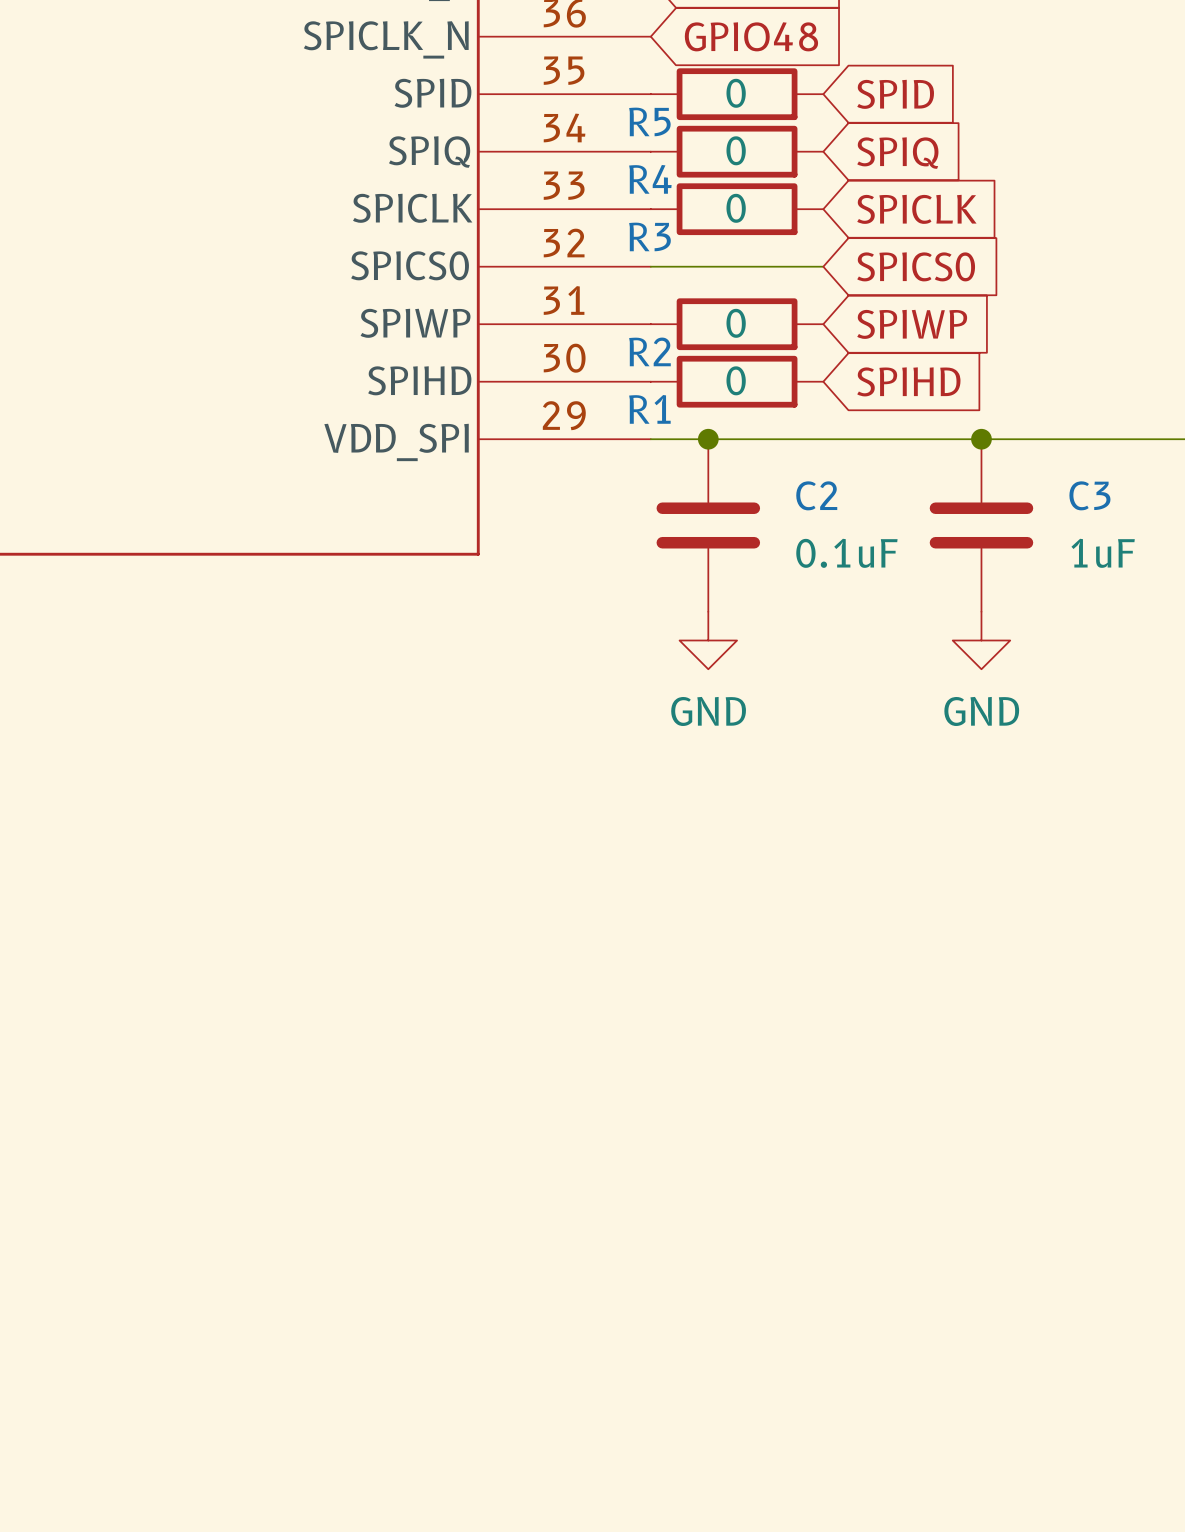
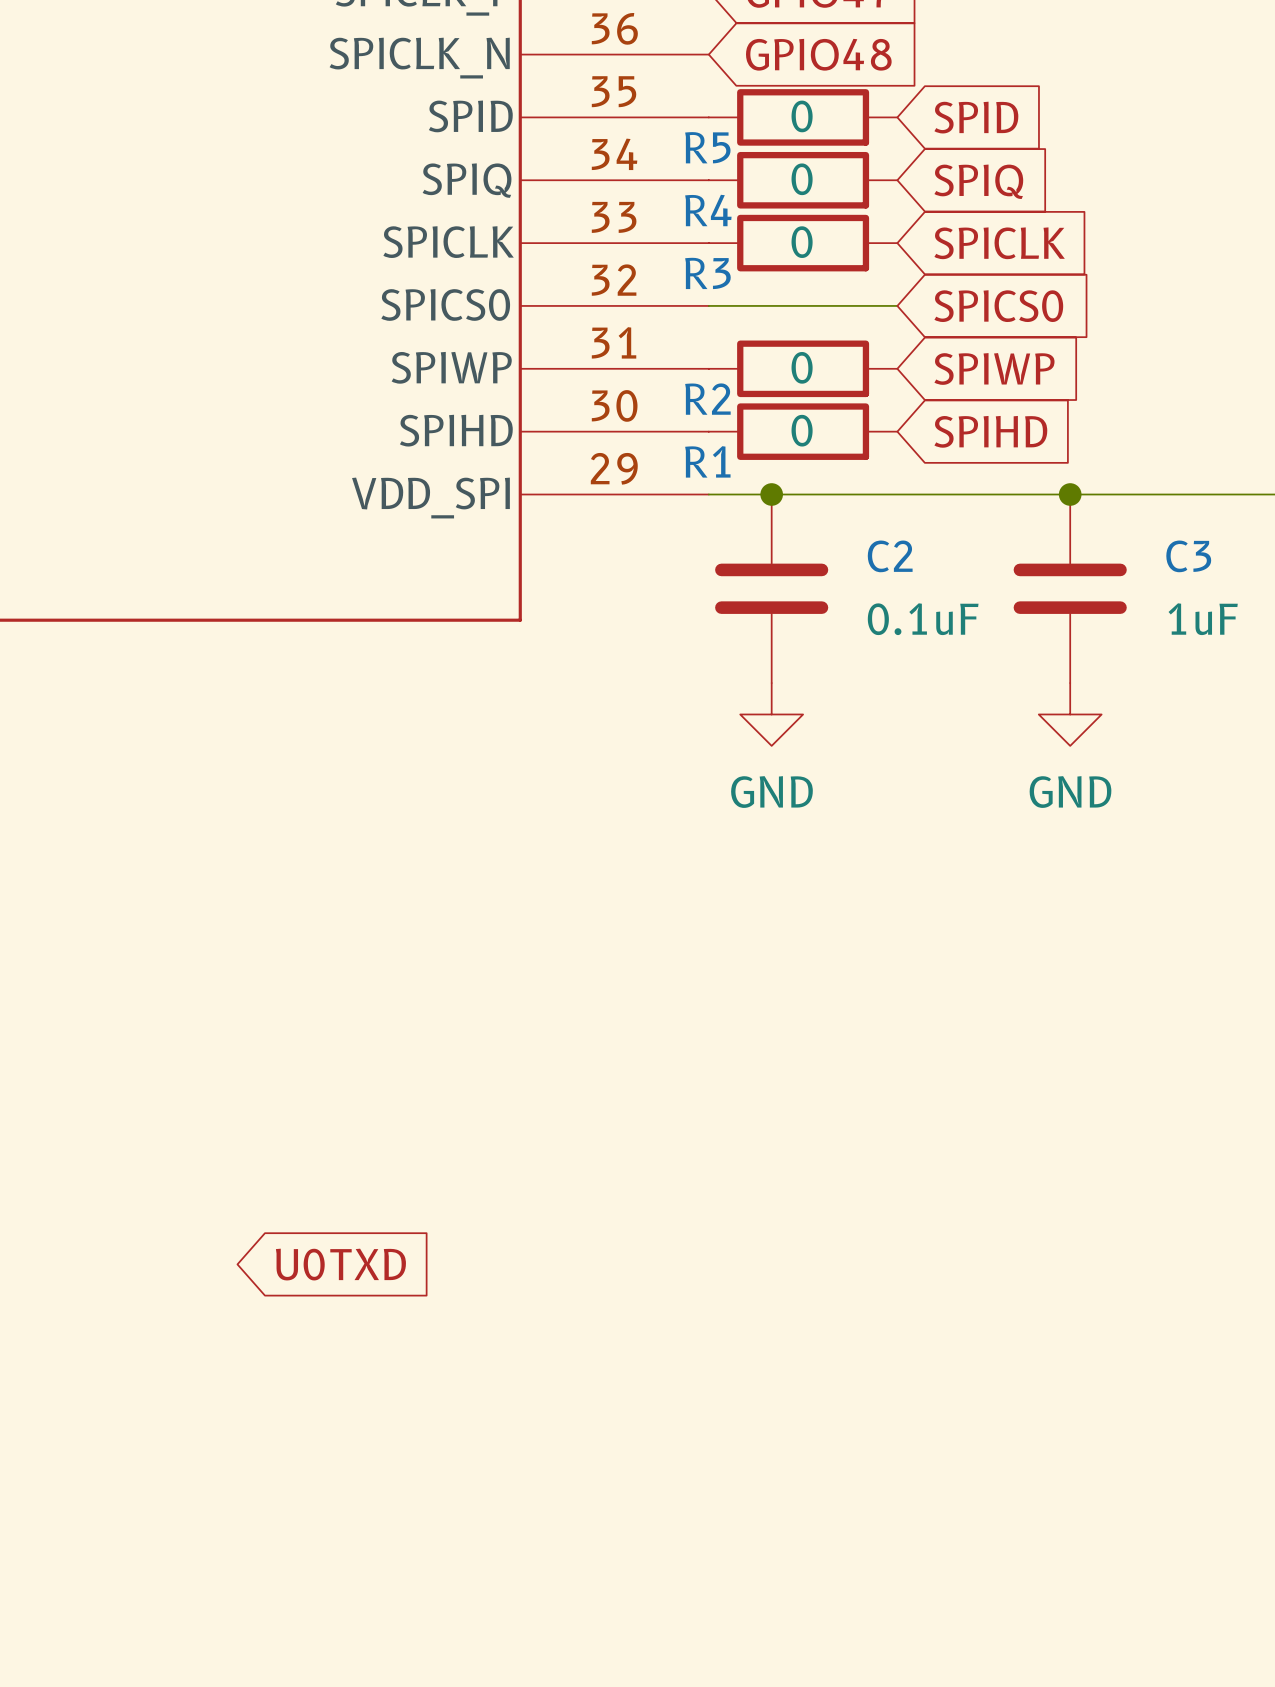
global label: none -> U0TXD (340, 1264)

